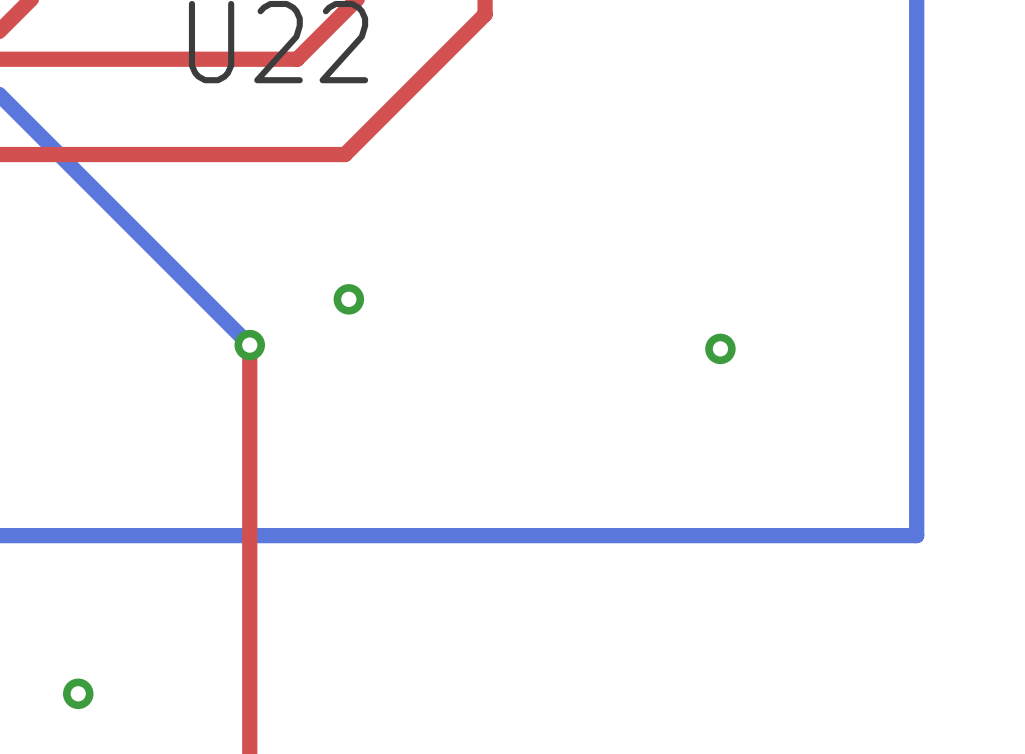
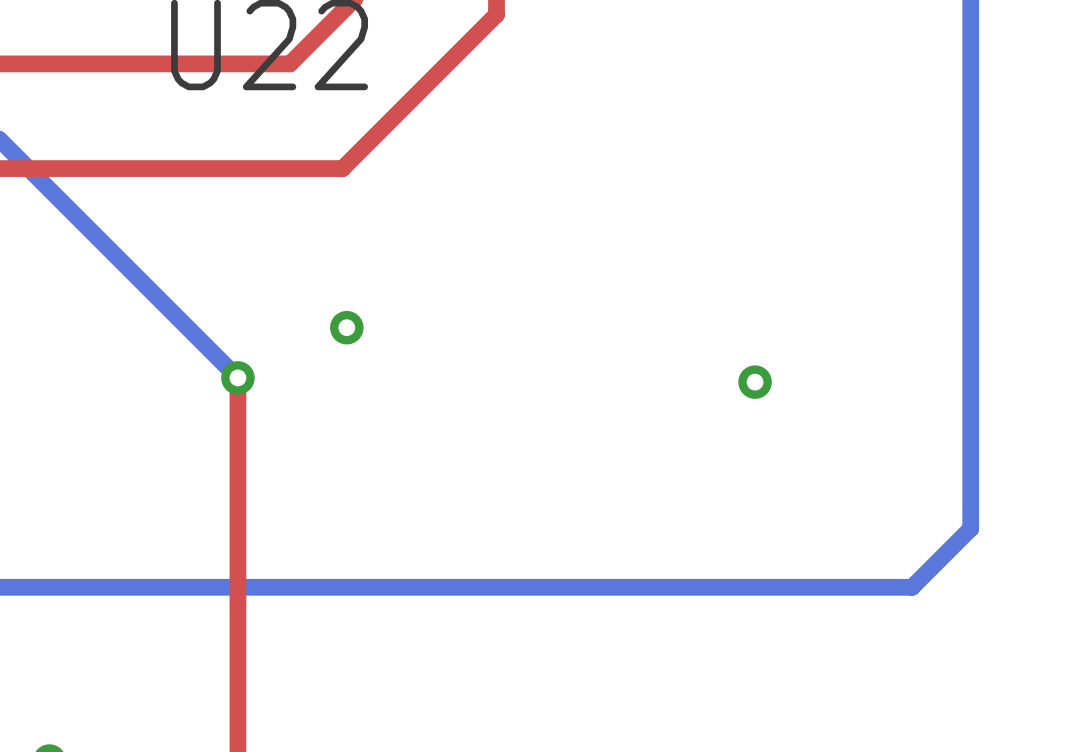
bottom track: (916, 482) (916, 535) (863, 535) -> (970, 528) (912, 587)

